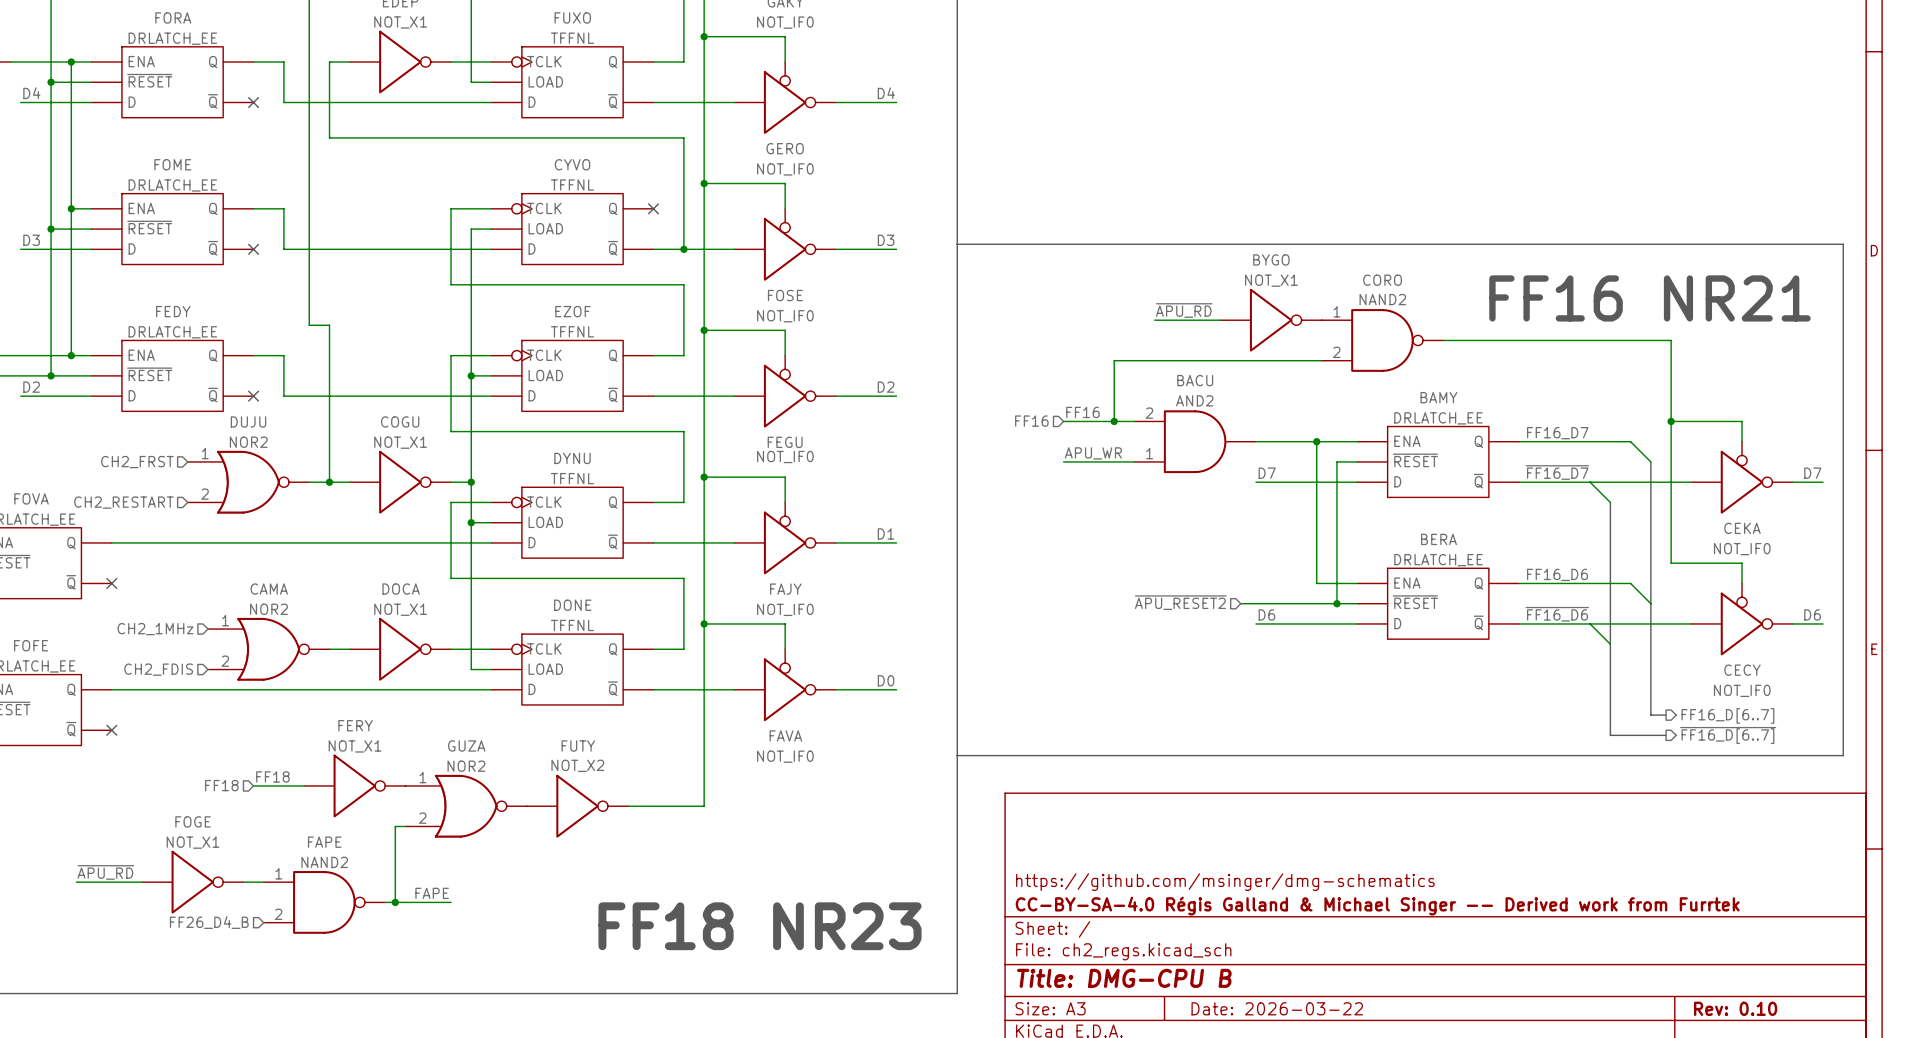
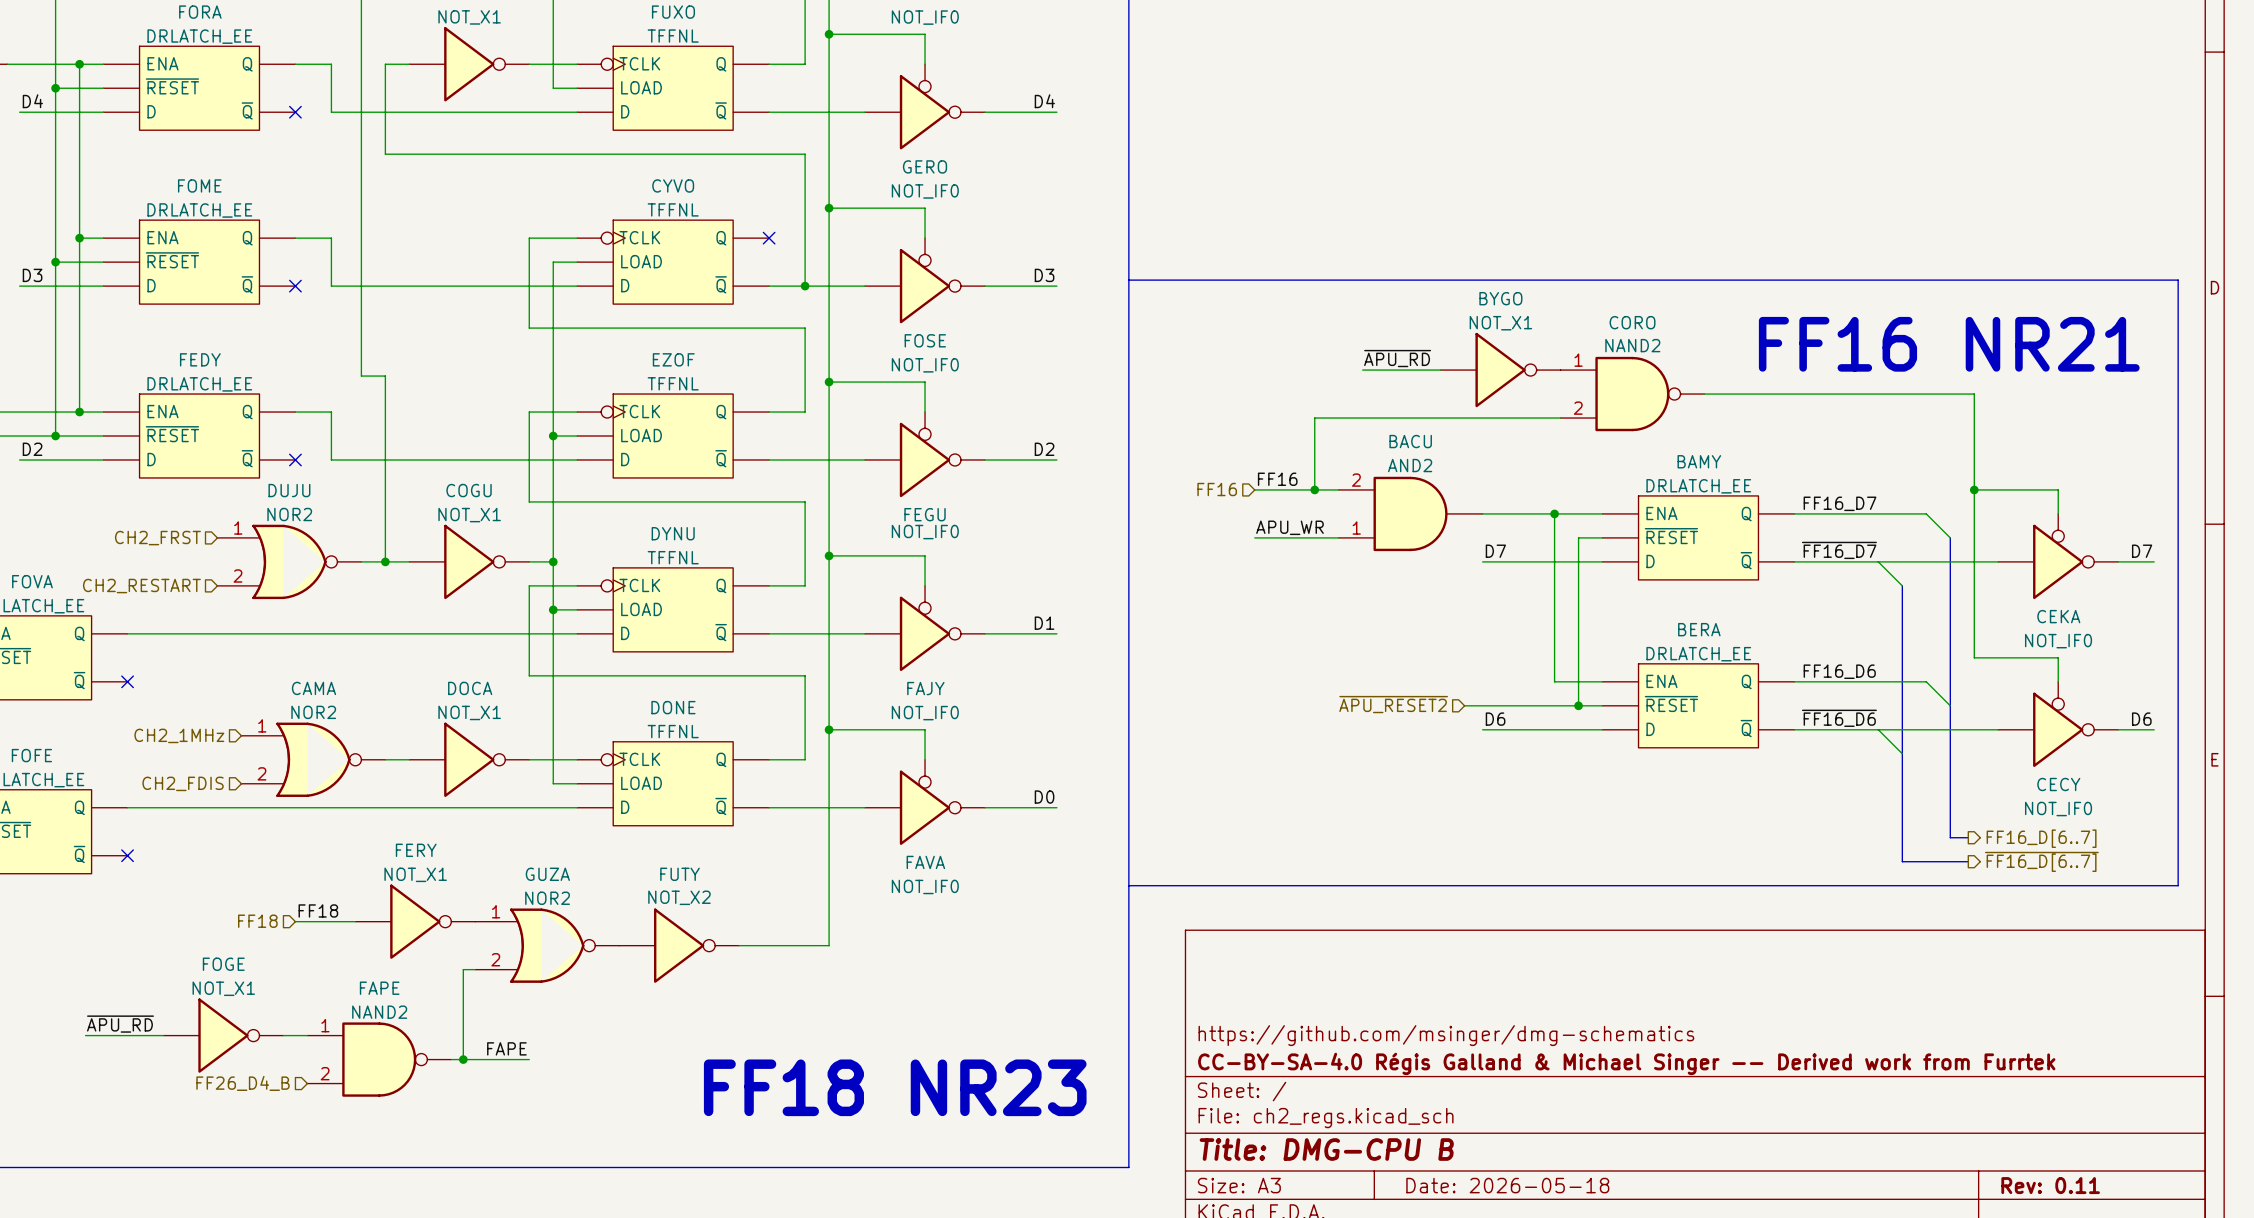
title block: Date: 2026-03-22 (1277, 1008) -> Date: 2026-05-18 (1507, 1185)
title block: Rev: 0.10 (1735, 1008) -> Rev: 0.11 (2050, 1185)

